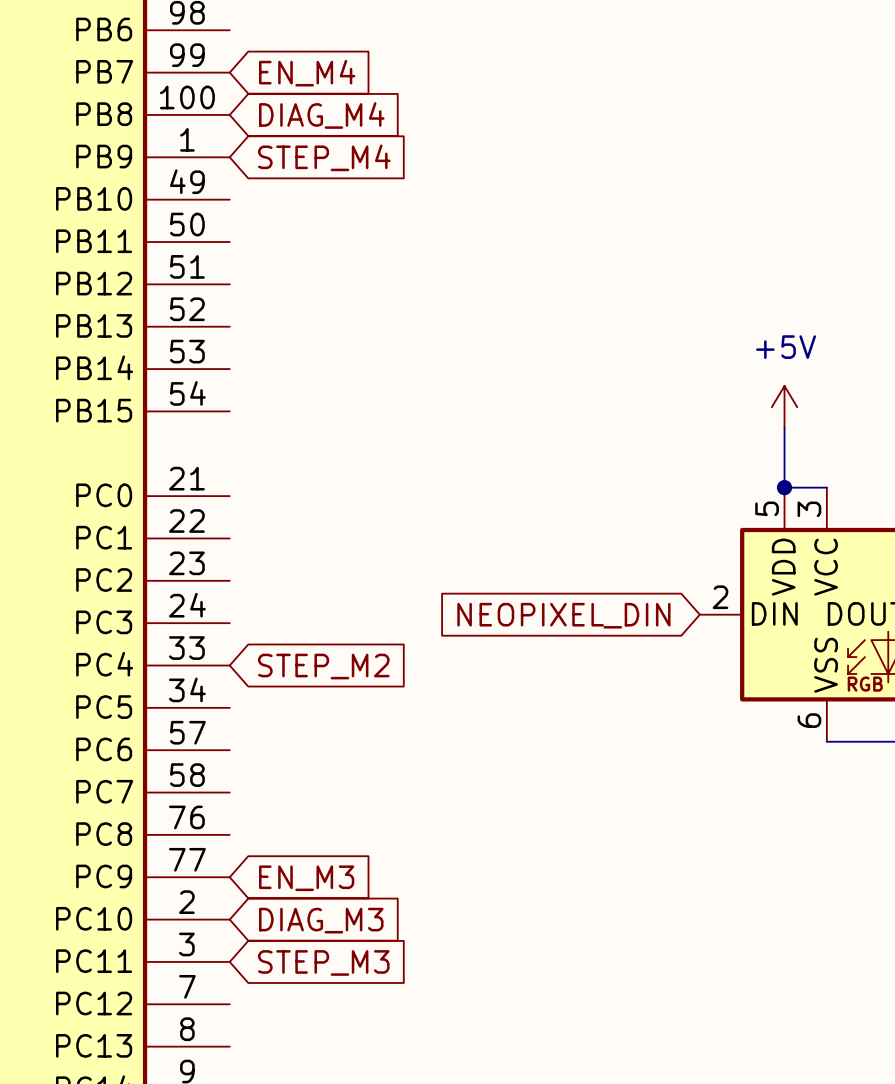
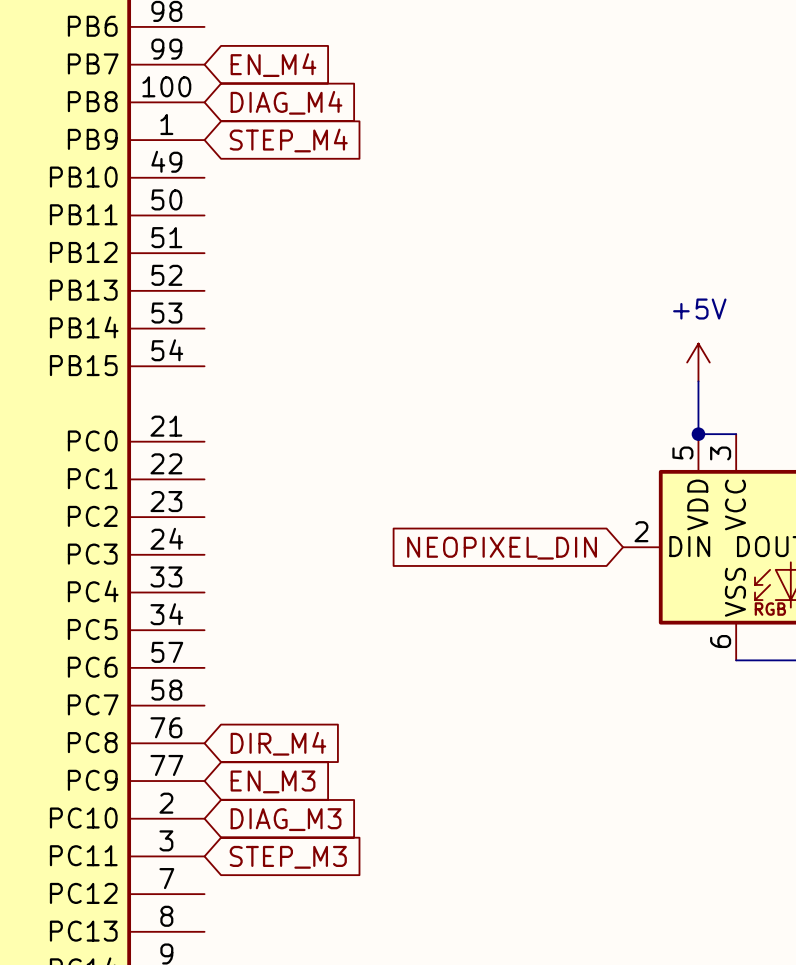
global label: STEP_M2 (323, 666) -> none
global label: none -> DIR_M4 (278, 743)

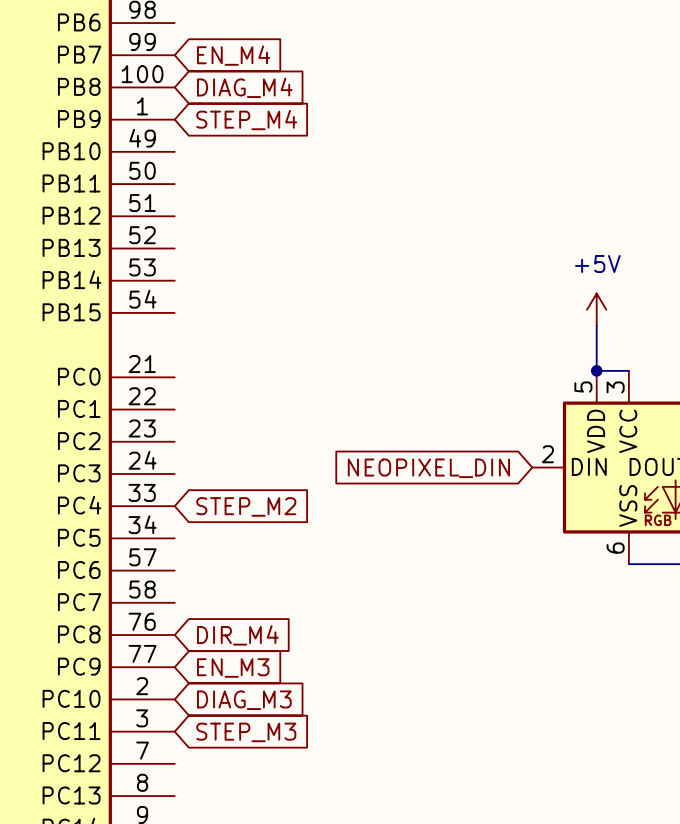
global label: none -> STEP_M2 (246, 506)

